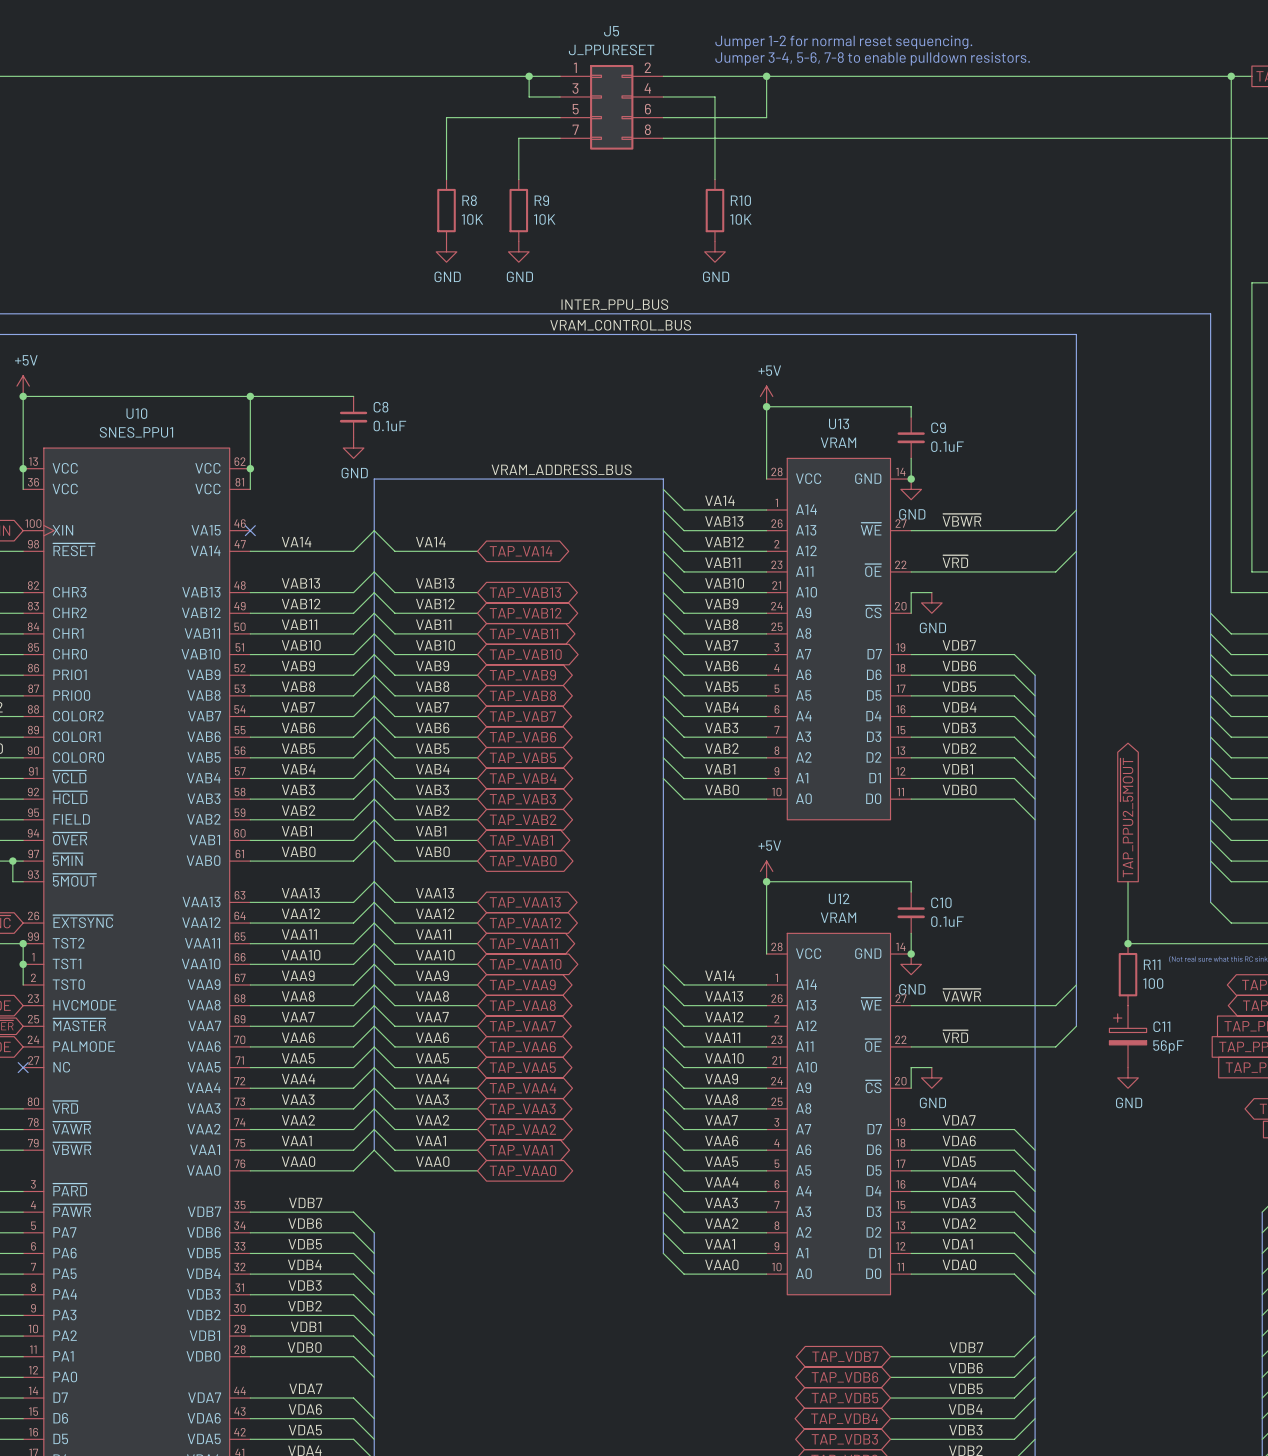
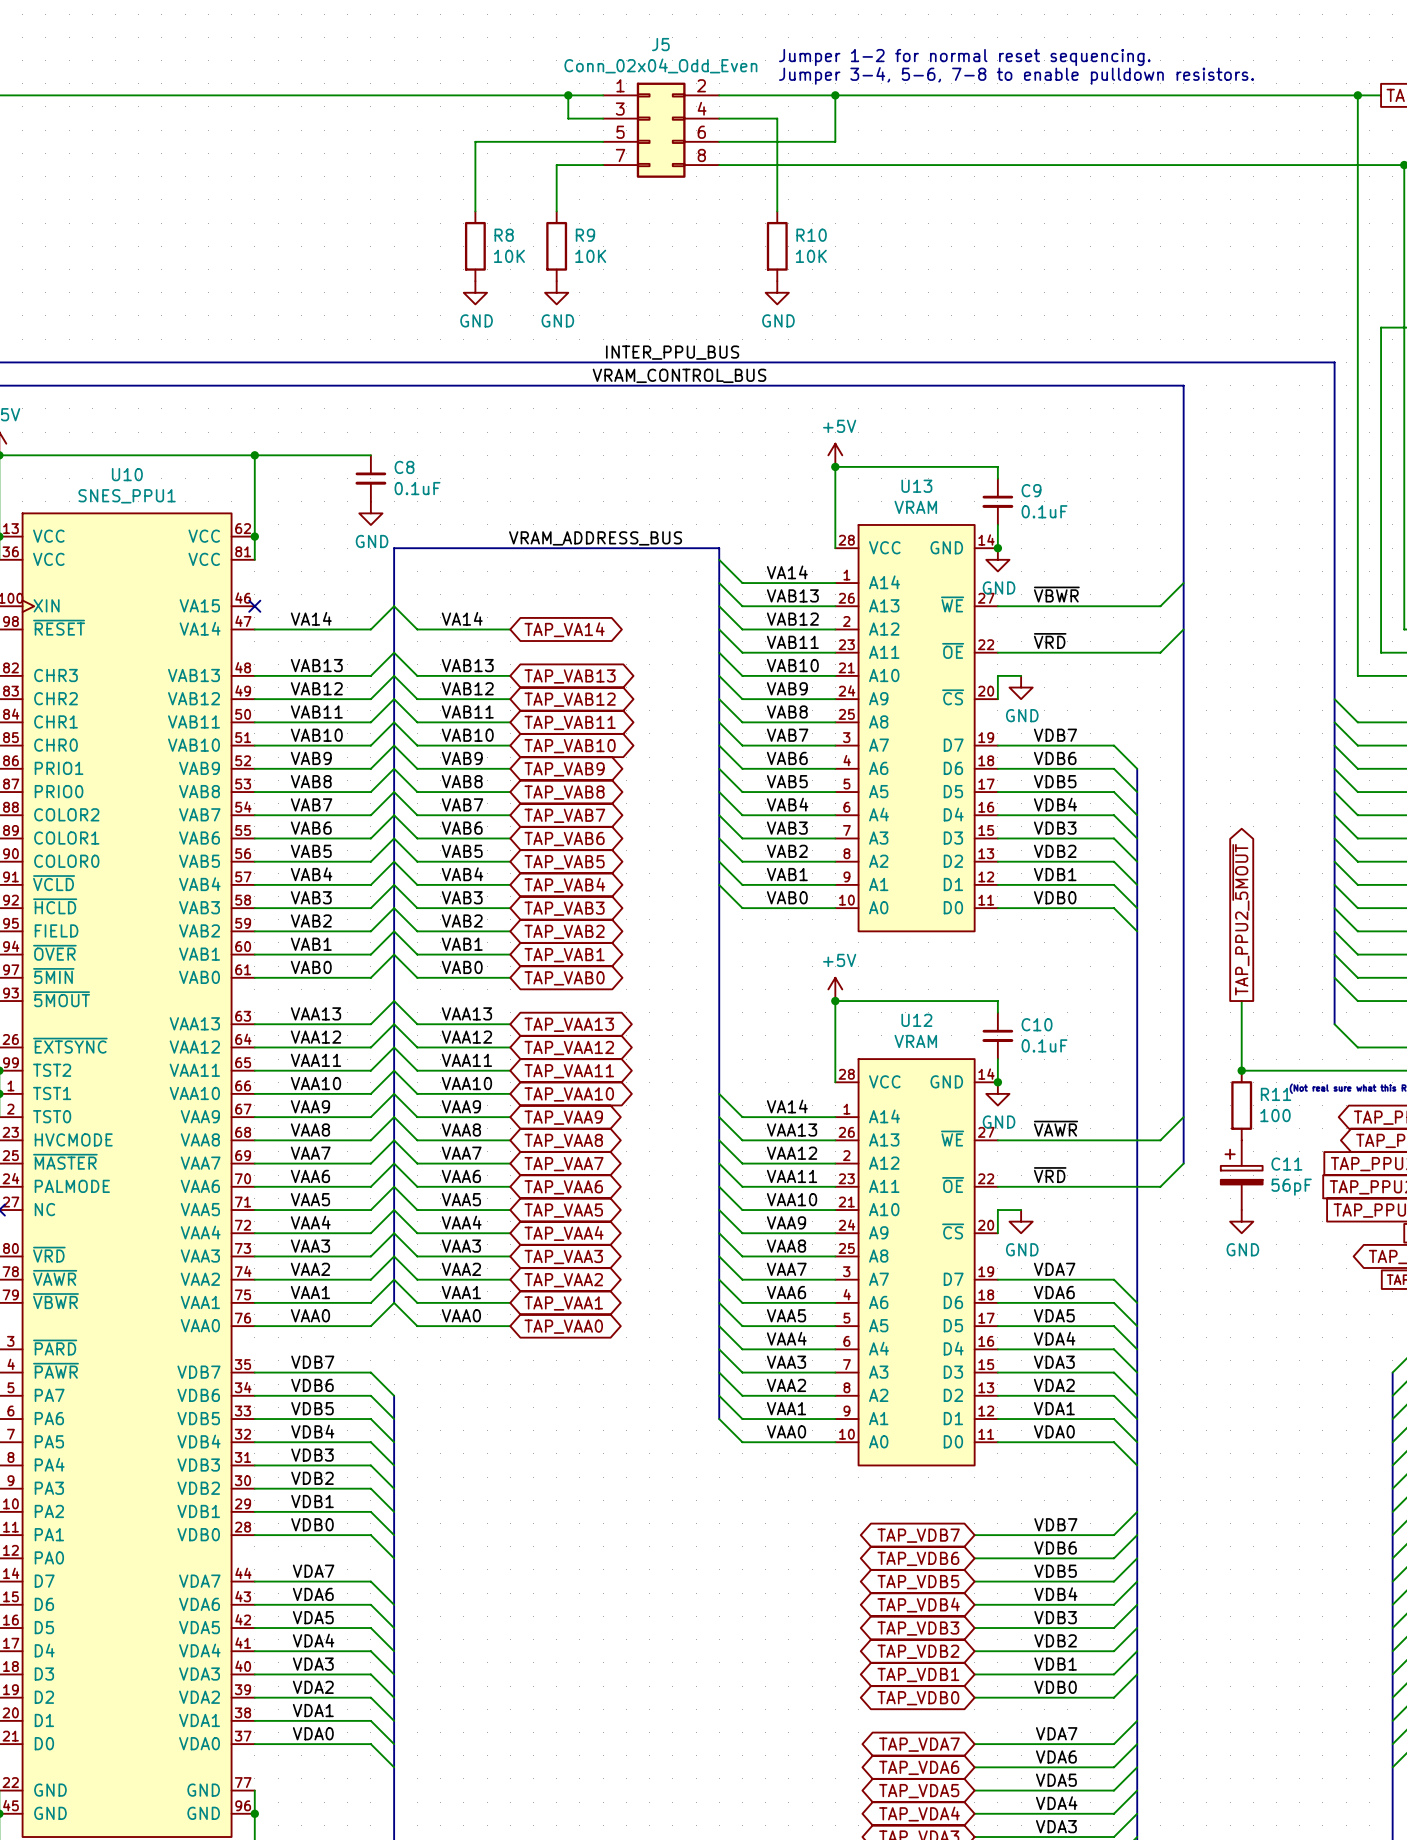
J5 value: J_PPURESET (611, 49) -> Conn_02x04_Odd_Even (660, 65)

